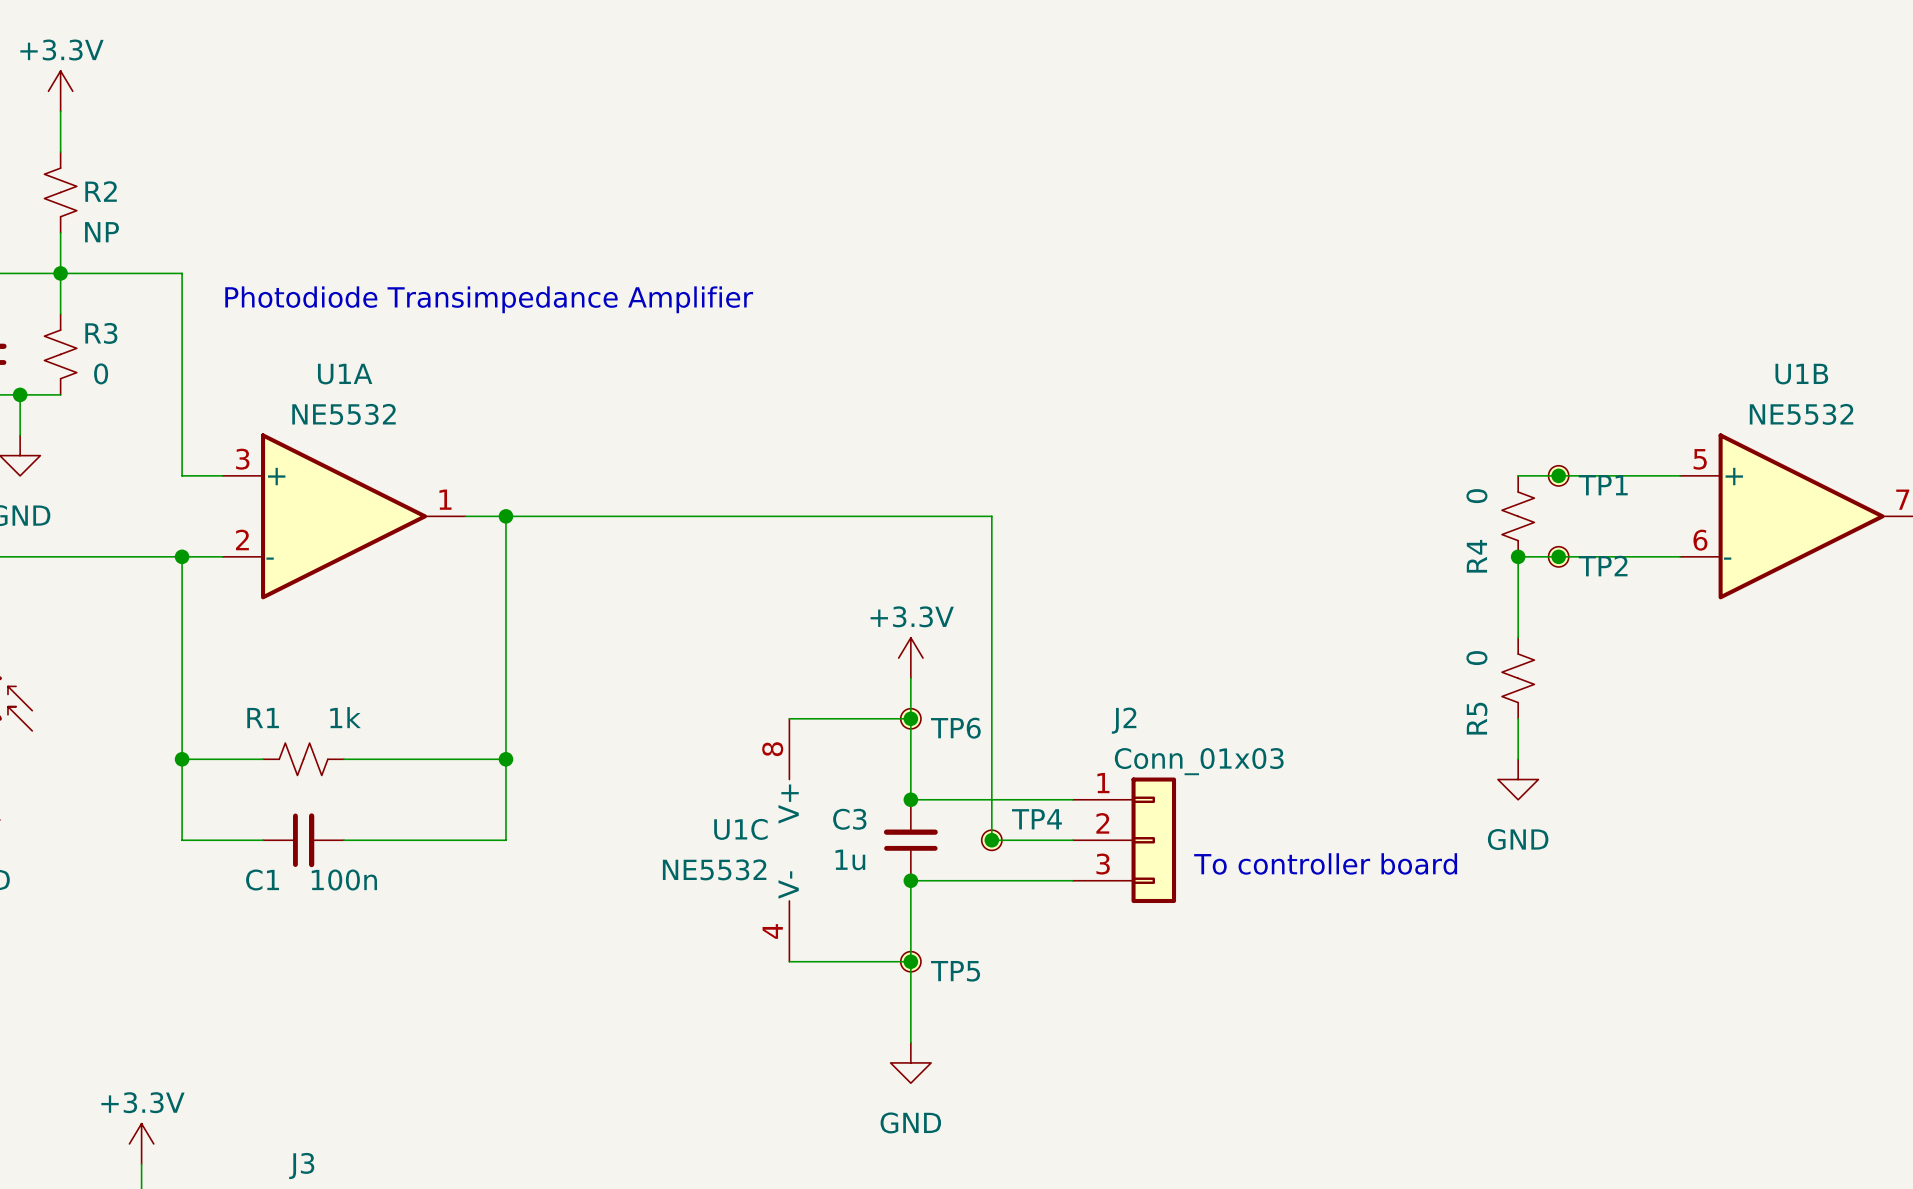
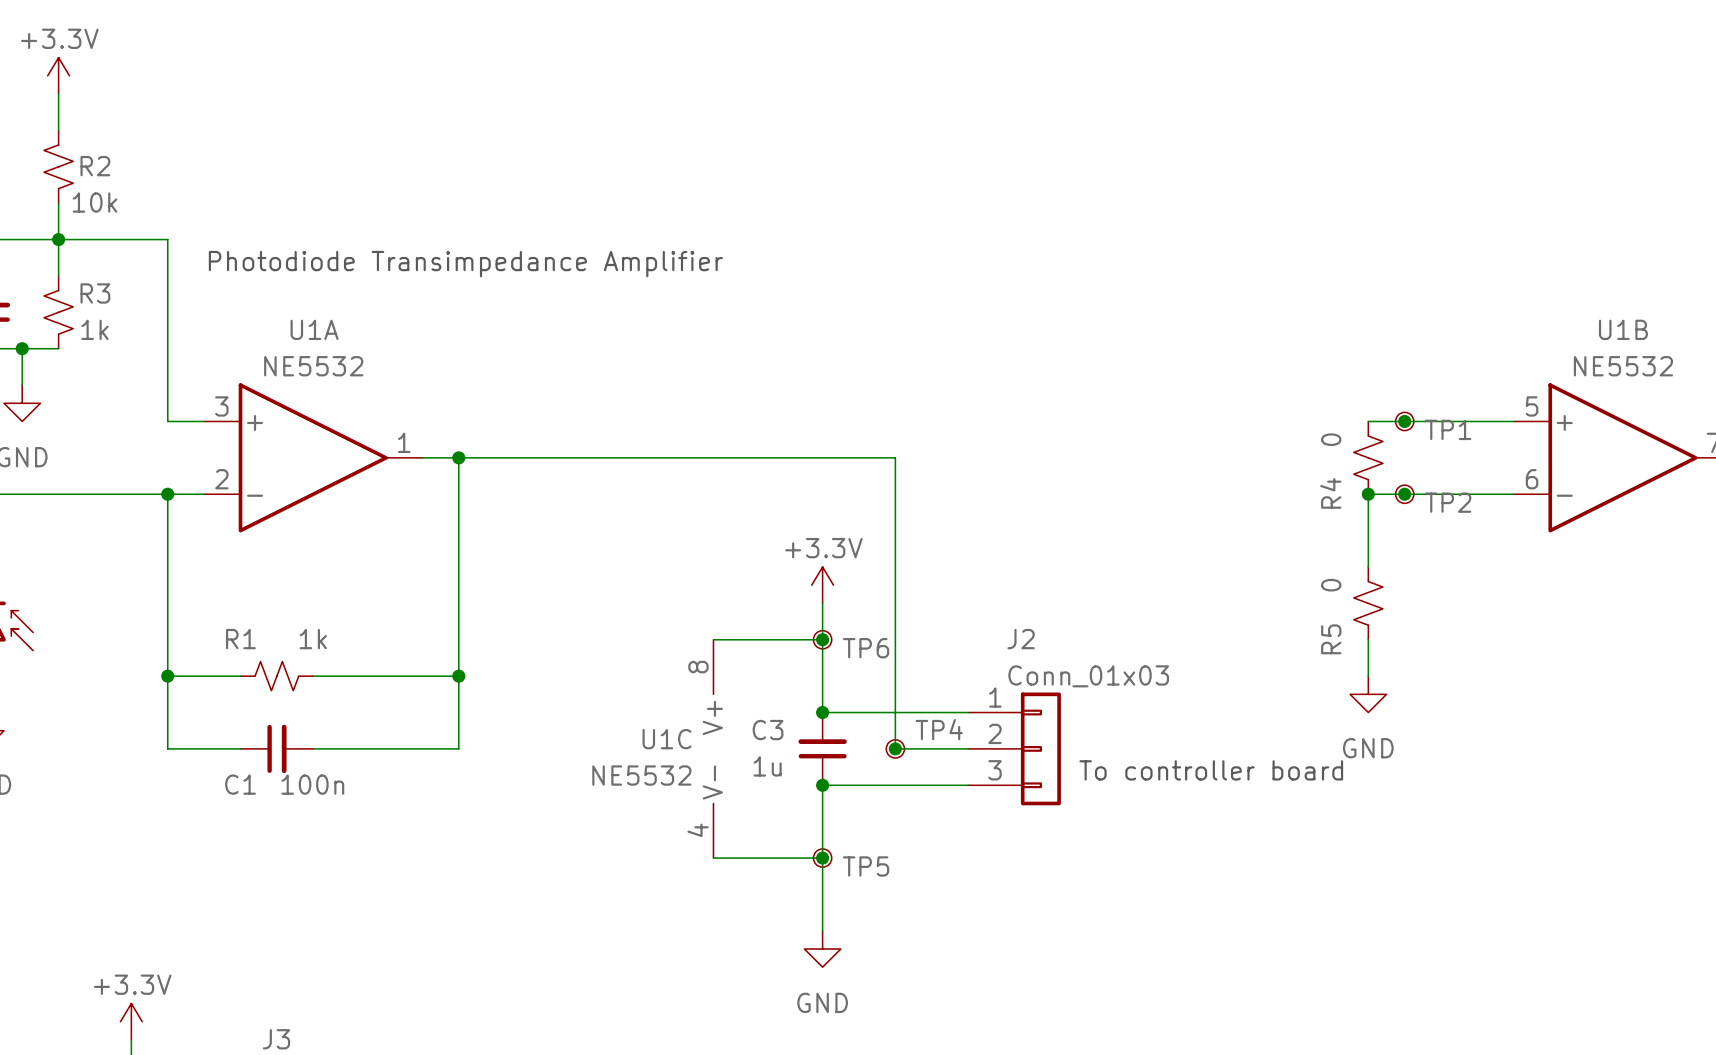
R2 value: NP (101, 232) -> 10k (94, 202)
R3 value: 0 (101, 373) -> 1k (94, 329)

